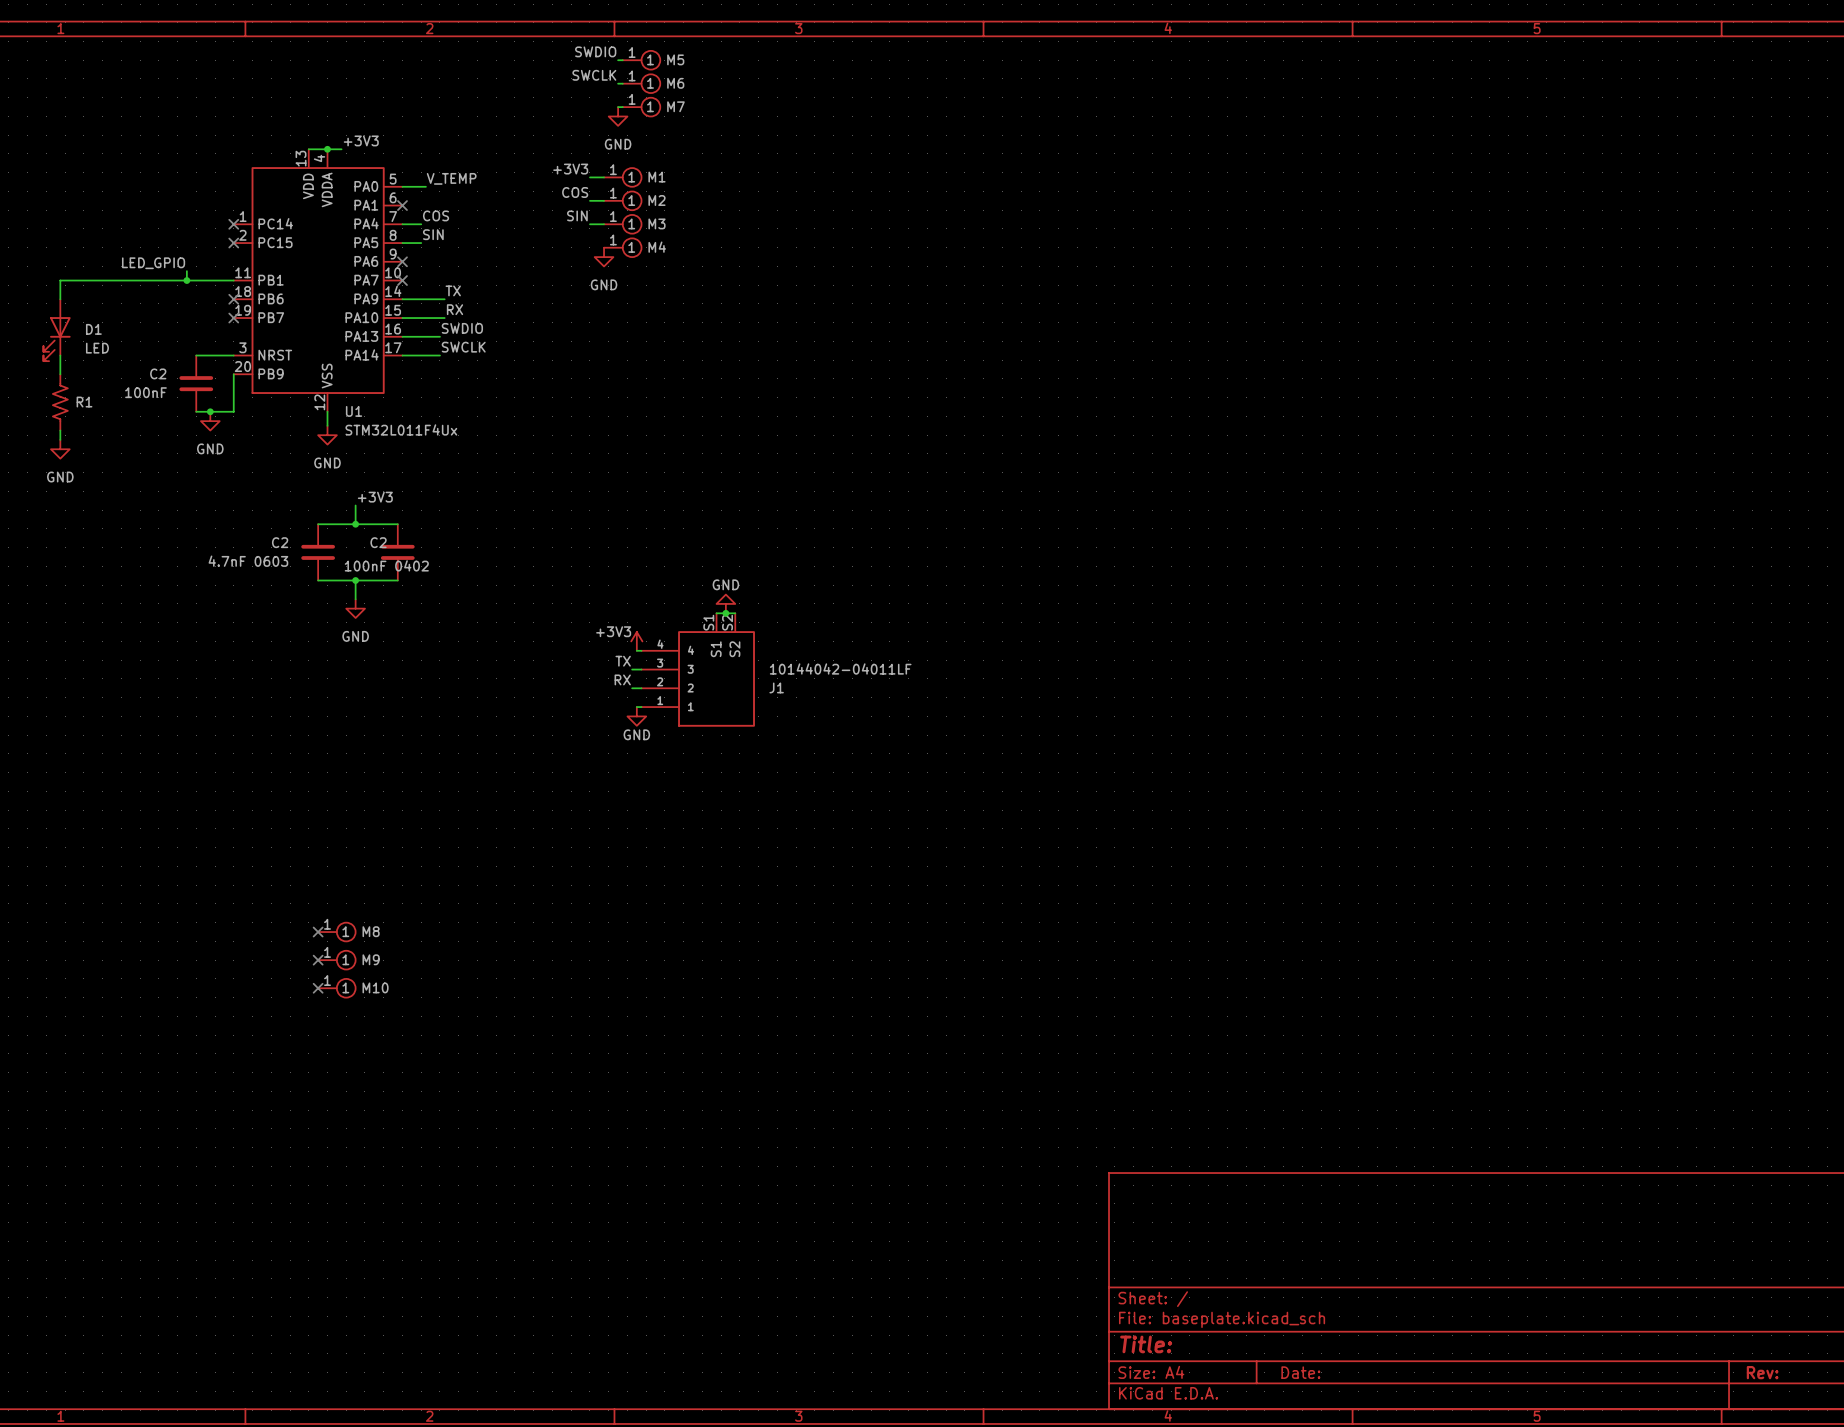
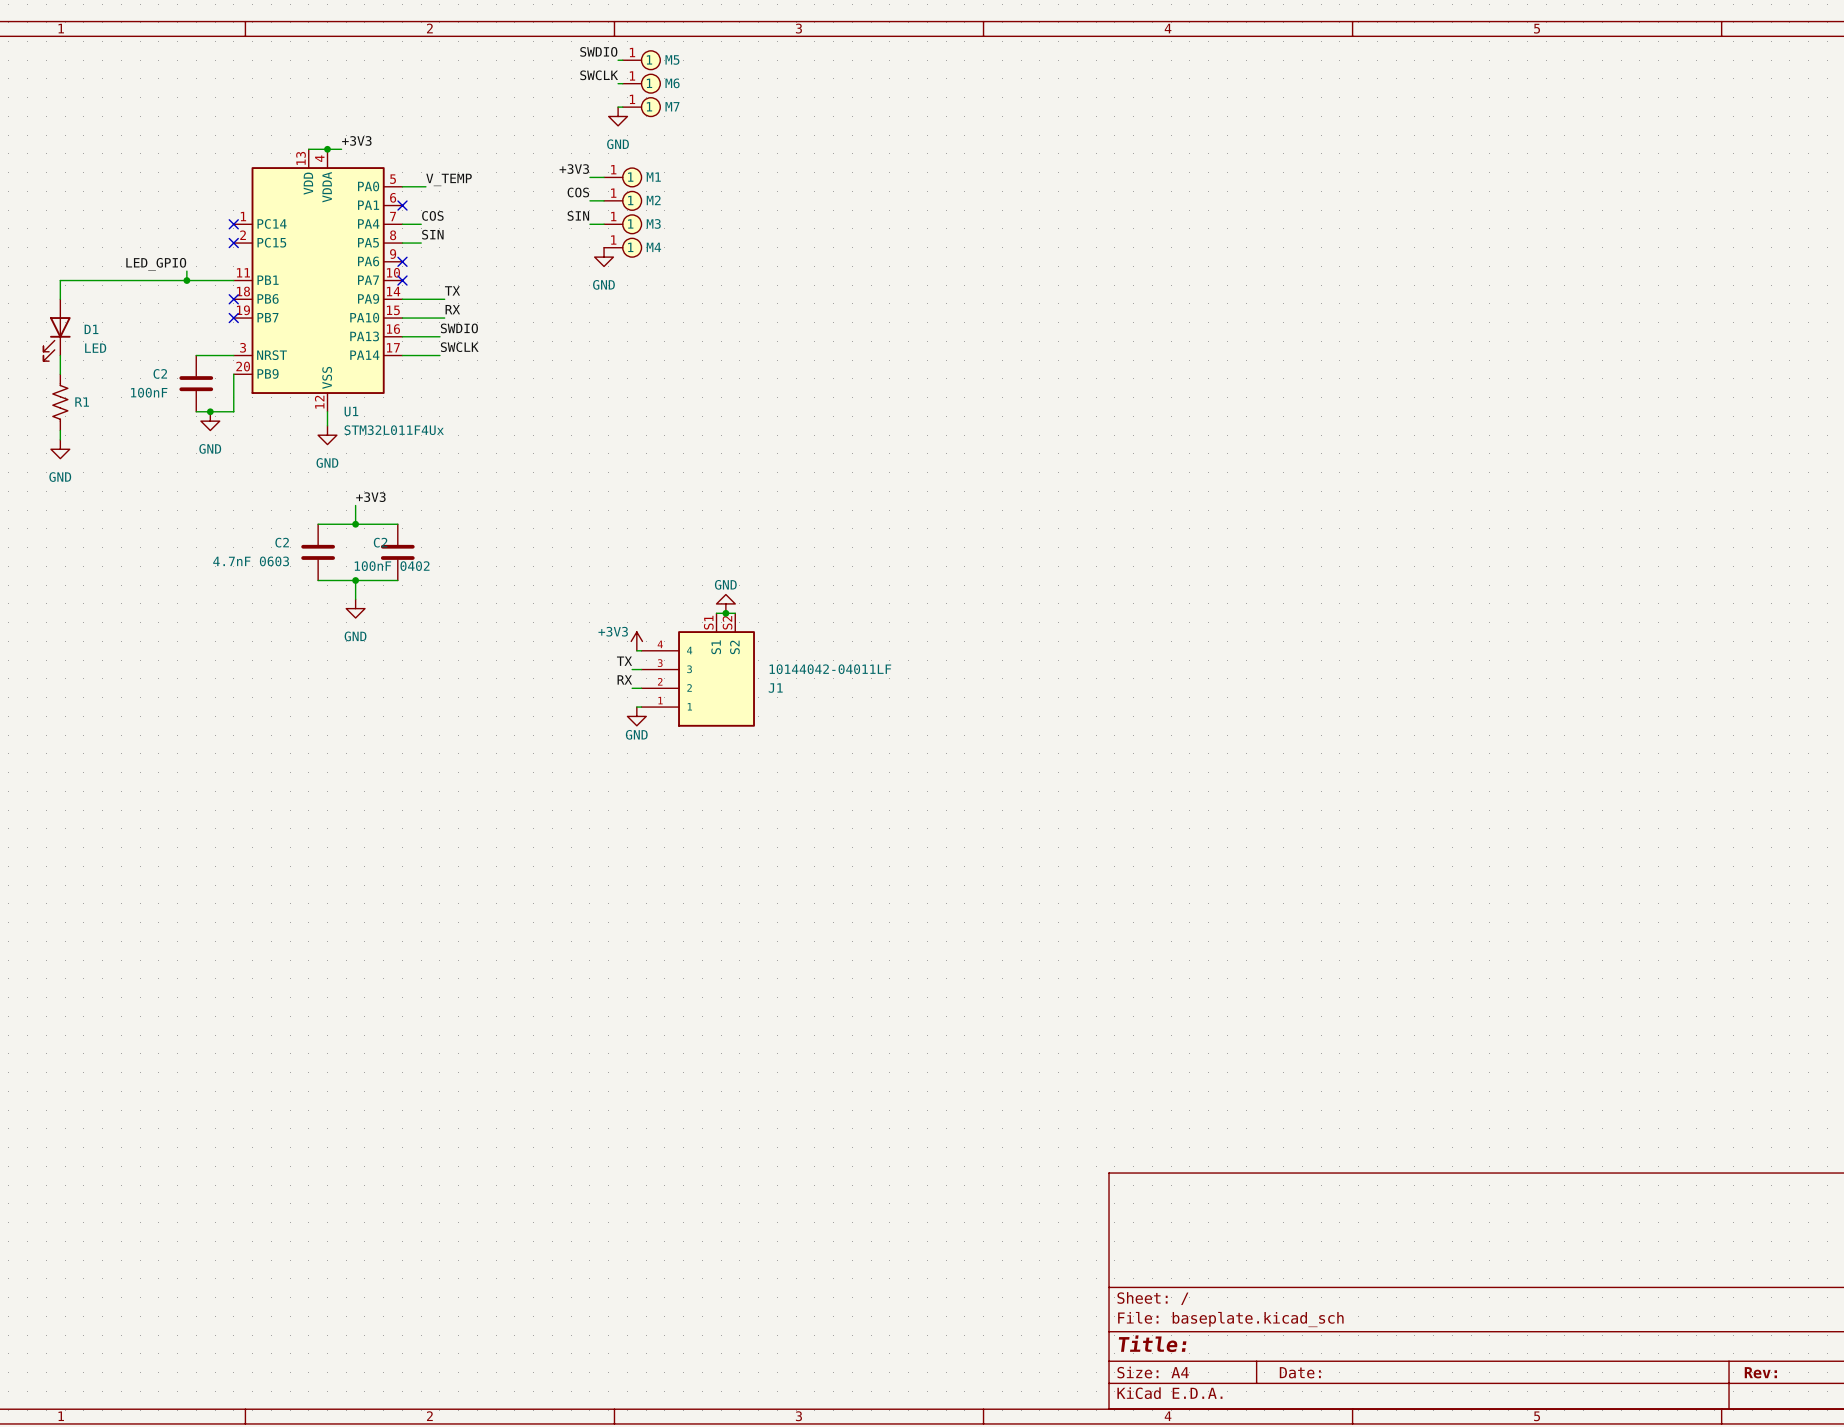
no-connect mark: (318, 932) -> none
M8: (336, 932) -> none
no-connect mark: (318, 960) -> none
M9: (336, 960) -> none
no-connect mark: (318, 988) -> none
M10: (336, 988) -> none

